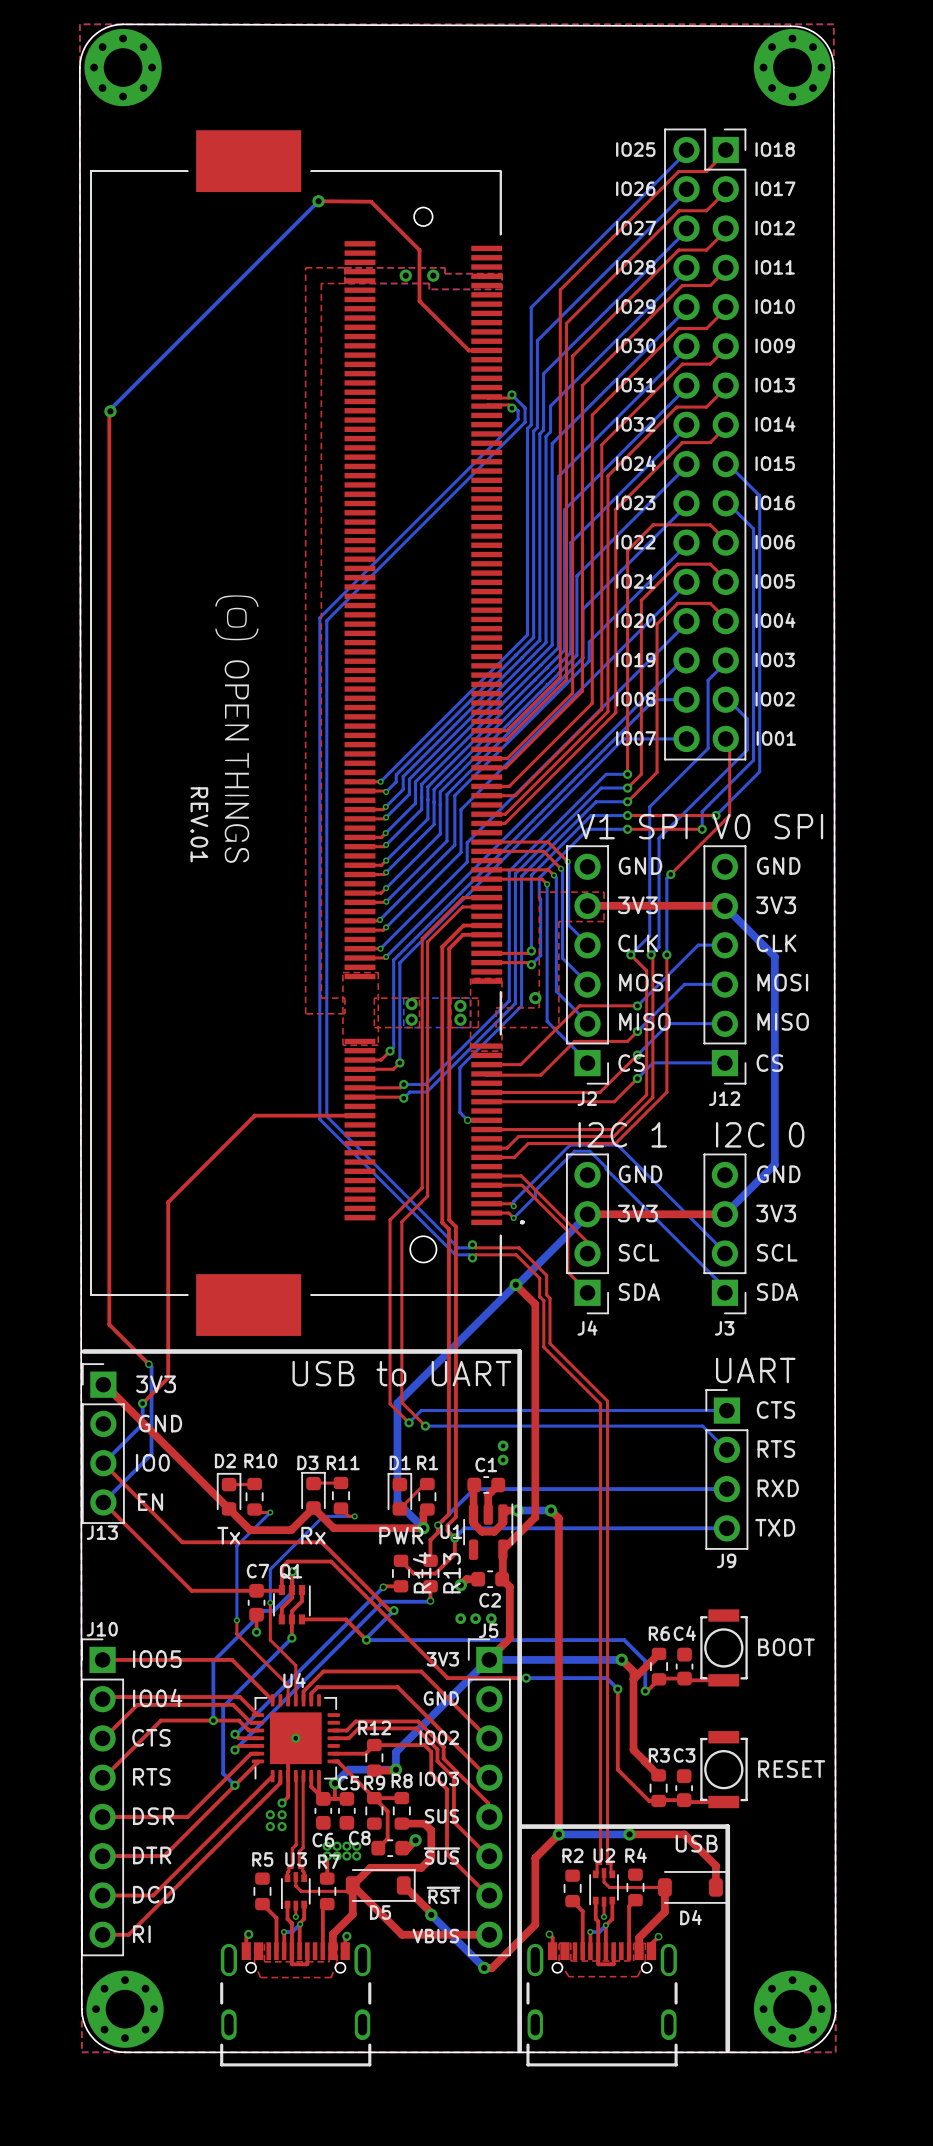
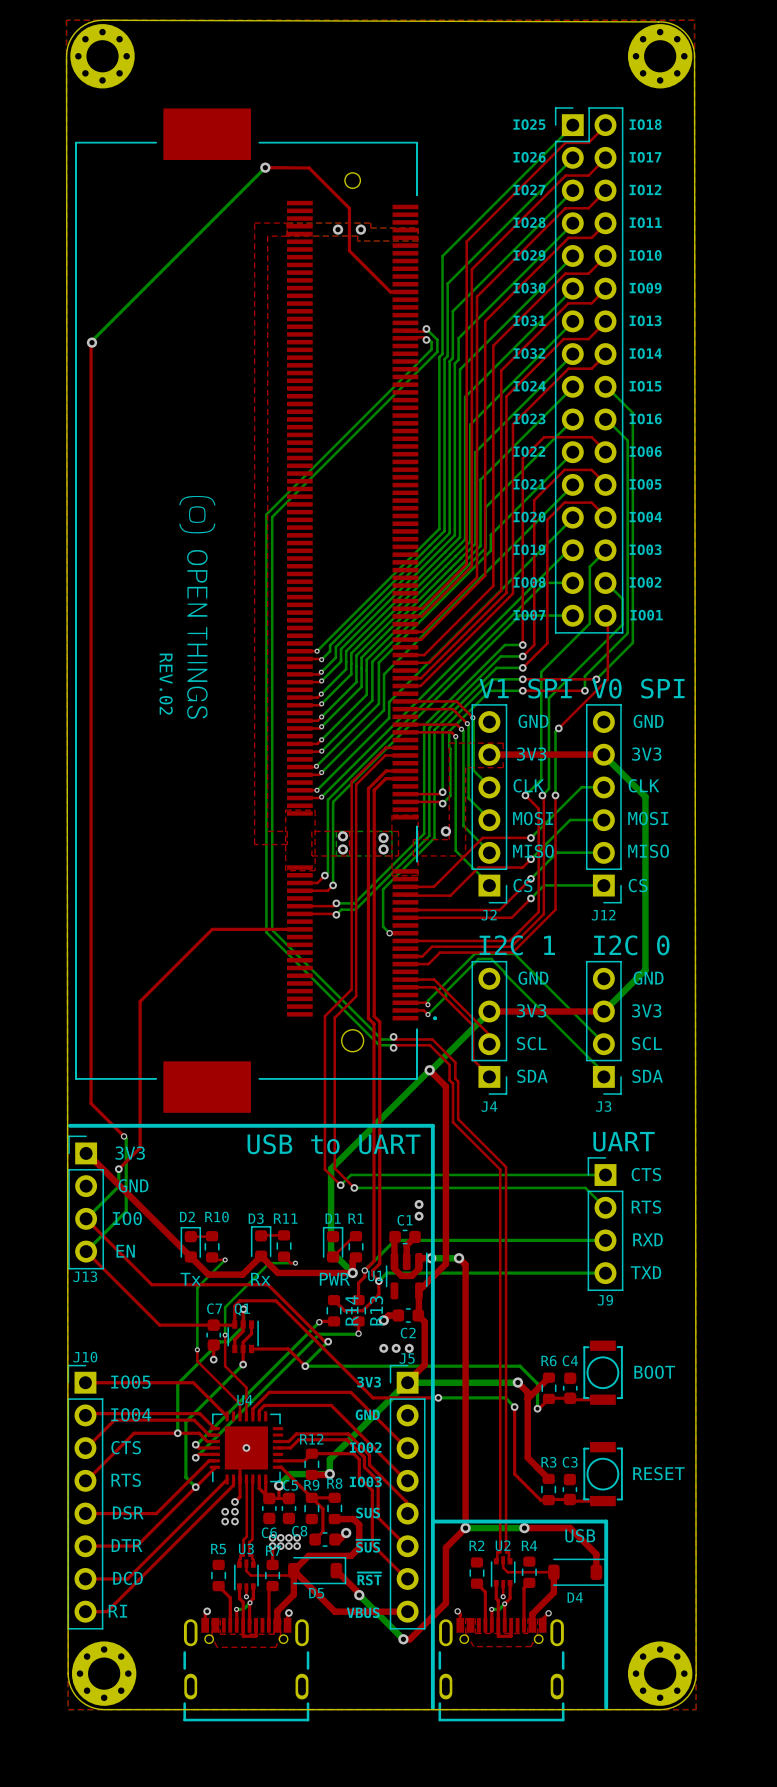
part side: bottom (705, 444) -> top (589, 370)
text: REV.01 (199, 824) -> REV.02 (166, 684)

